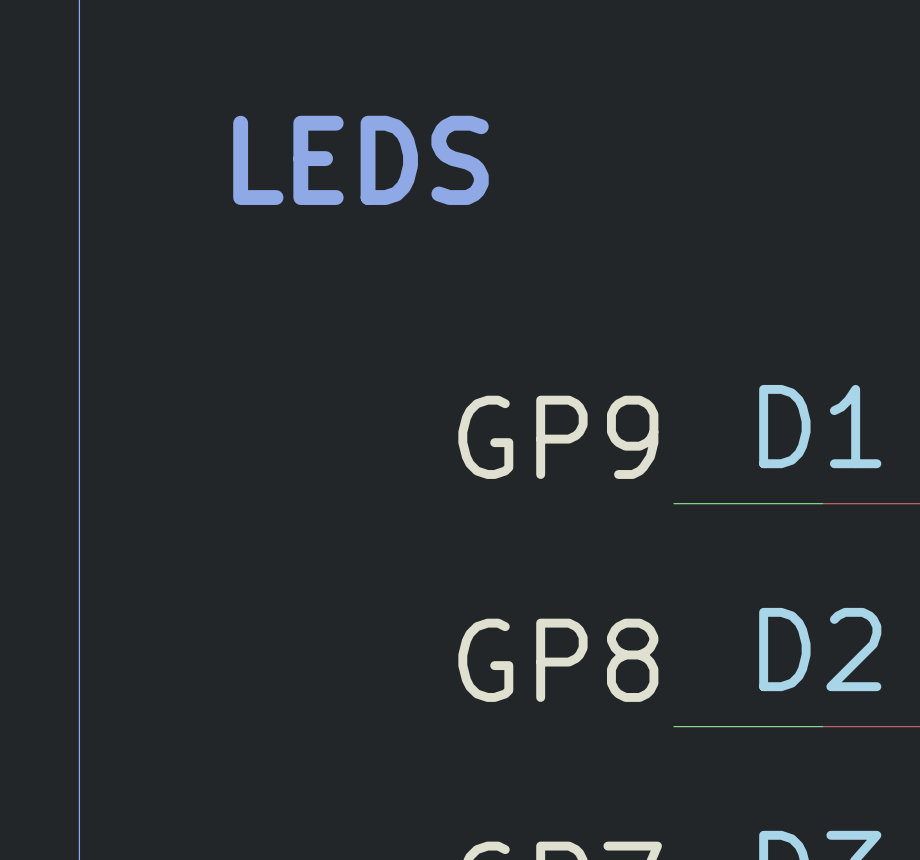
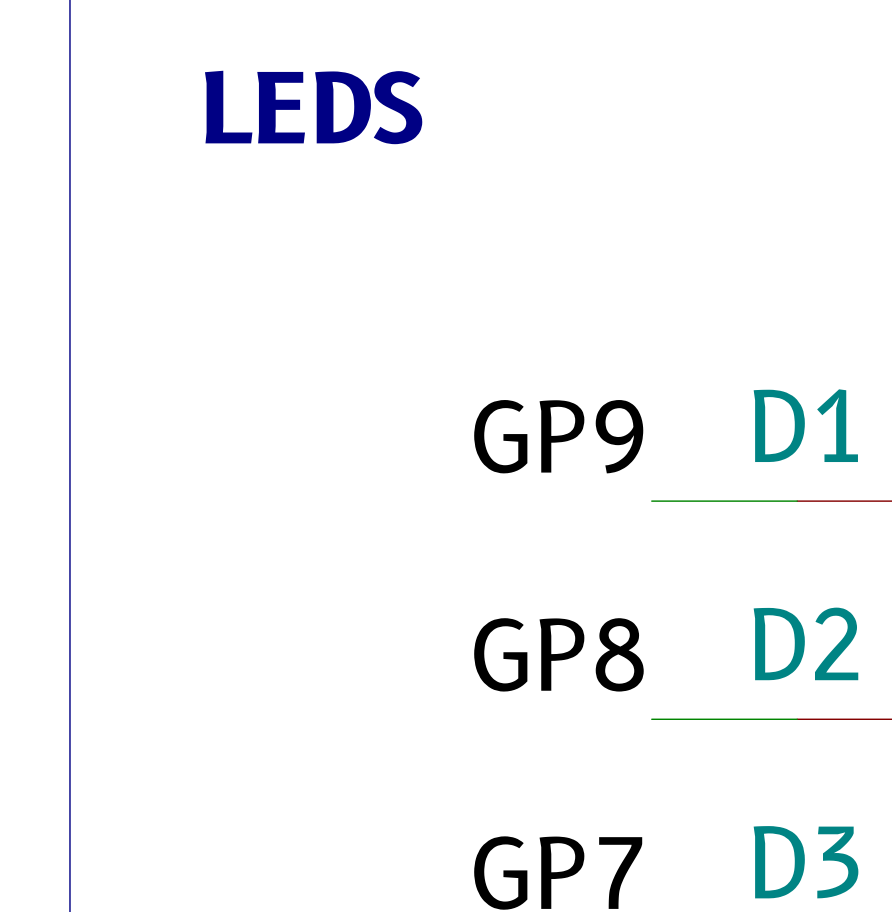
text position: LEDS (360, 160) -> LEDS (313, 107)

